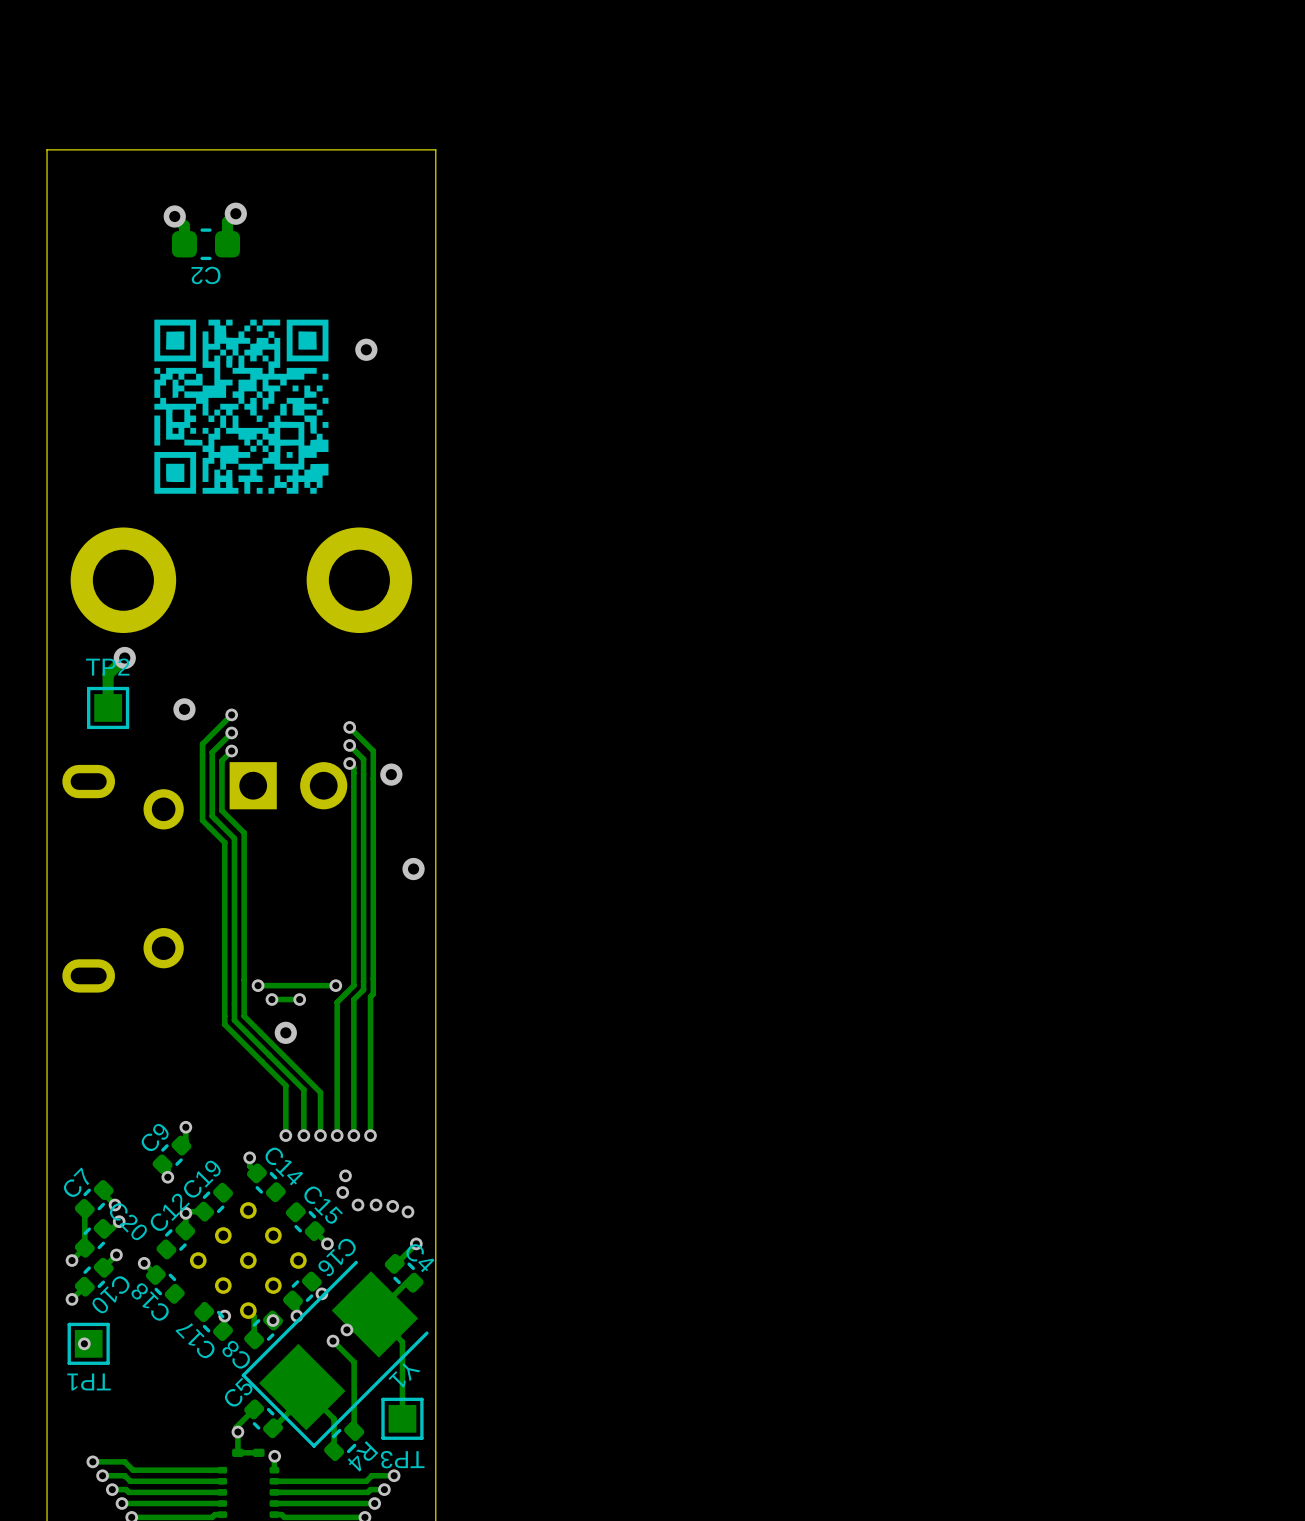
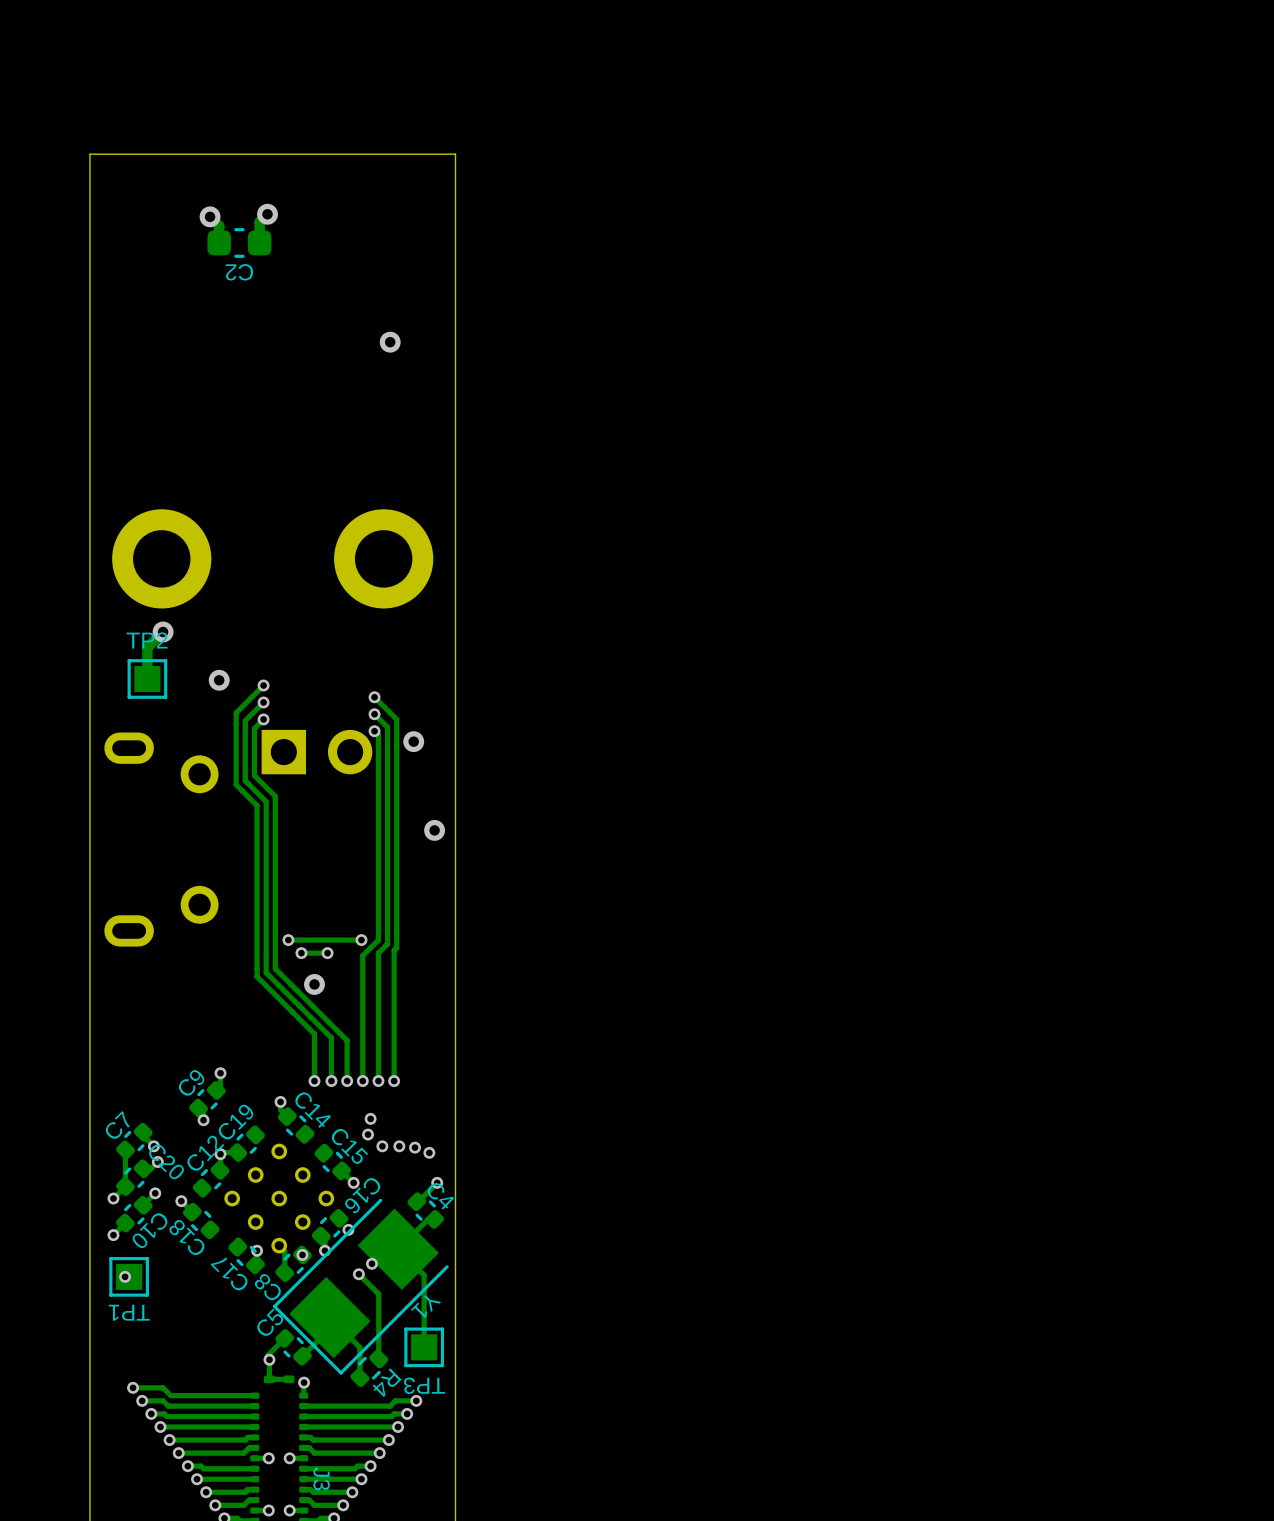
drawing: [154, 319, 329, 494] -> none

